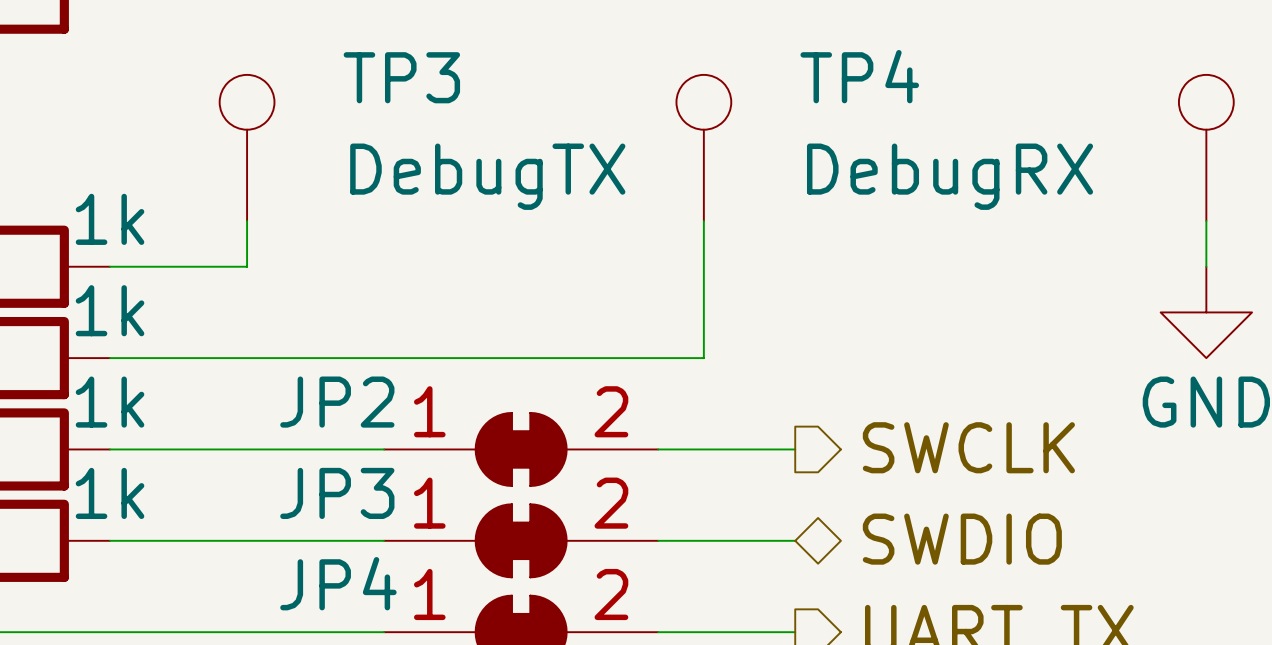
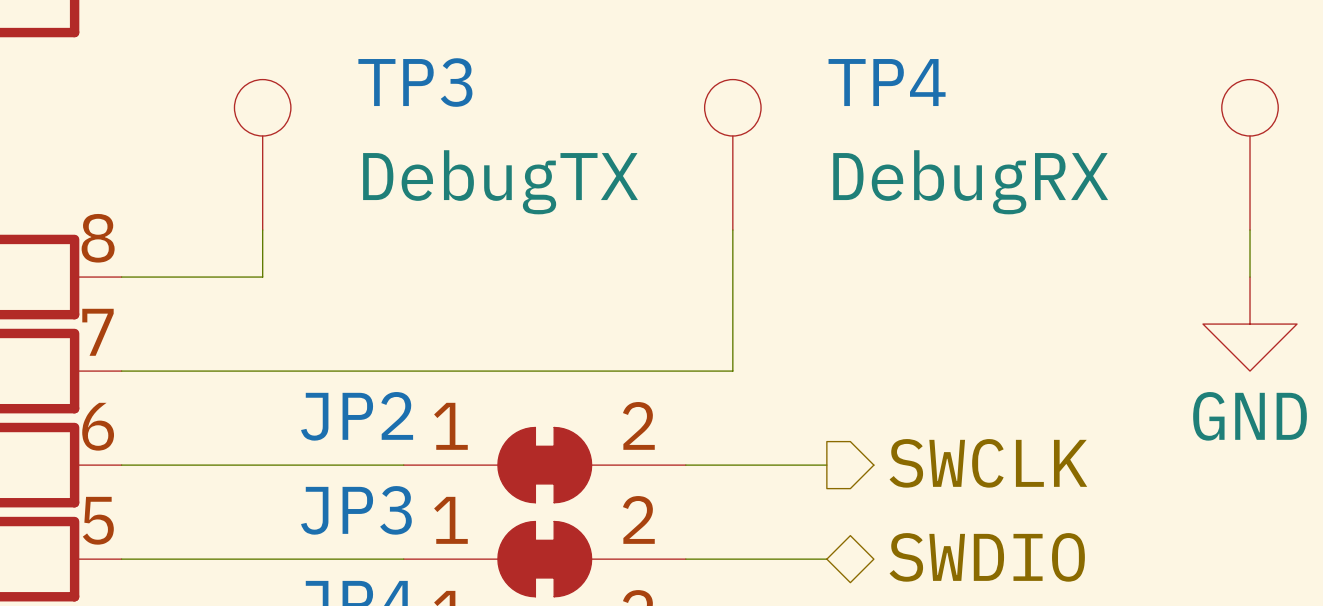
part value: 1k (110, 219) -> none
part pin number: none -> 8 (98, 238)
part value: 1k (110, 310) -> none
part pin number: none -> 7 (97, 332)
part value: 1k (110, 402) -> none
part pin number: none -> 6 (98, 426)
part value: 1k (110, 493) -> none
part pin number: none -> 5 (98, 520)

